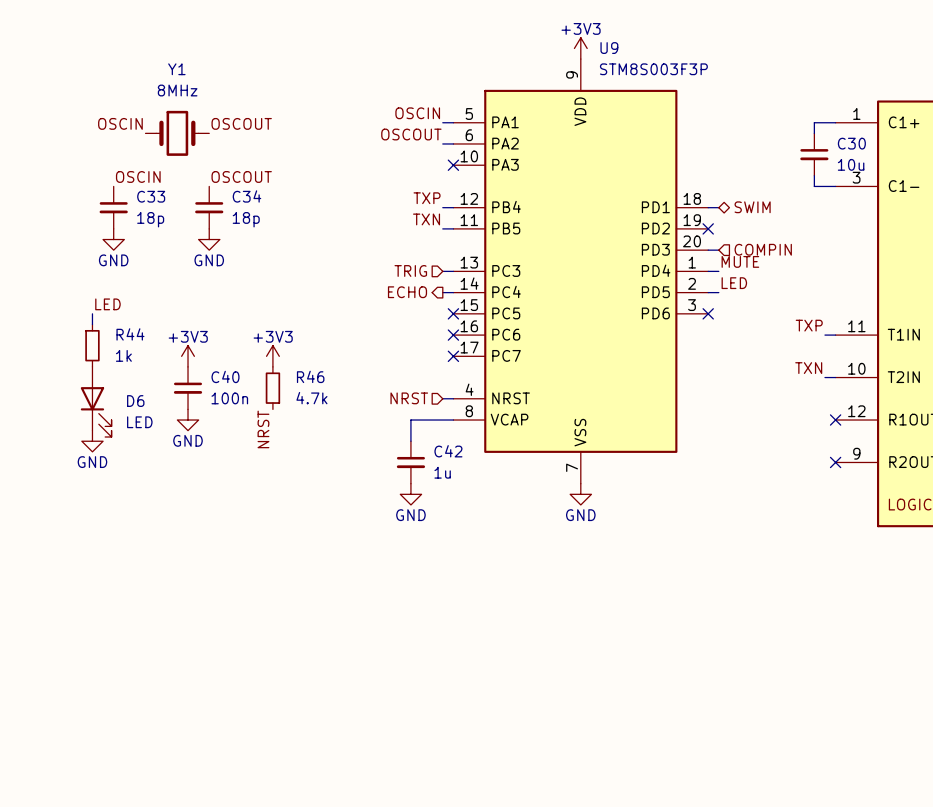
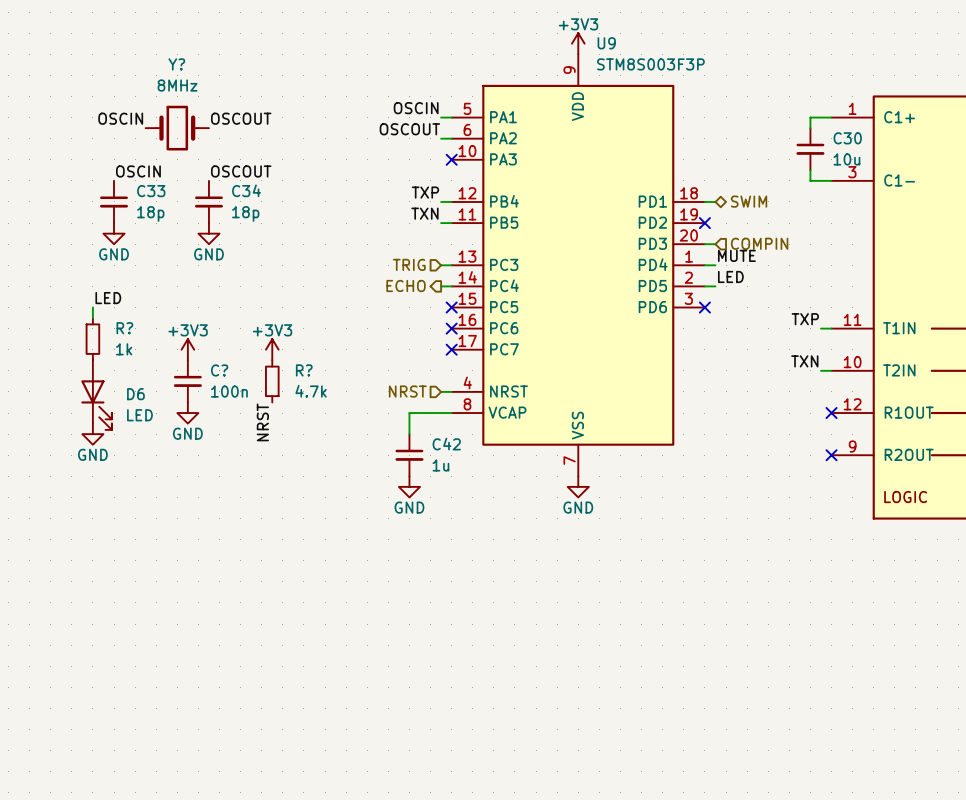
Y1 name: Y1 (176, 69) -> Y? (176, 64)
R44 name: R44 (130, 334) -> R? (124, 328)
C40 name: C40 (225, 376) -> C? (219, 370)
R46 name: R46 (310, 376) -> R? (304, 370)

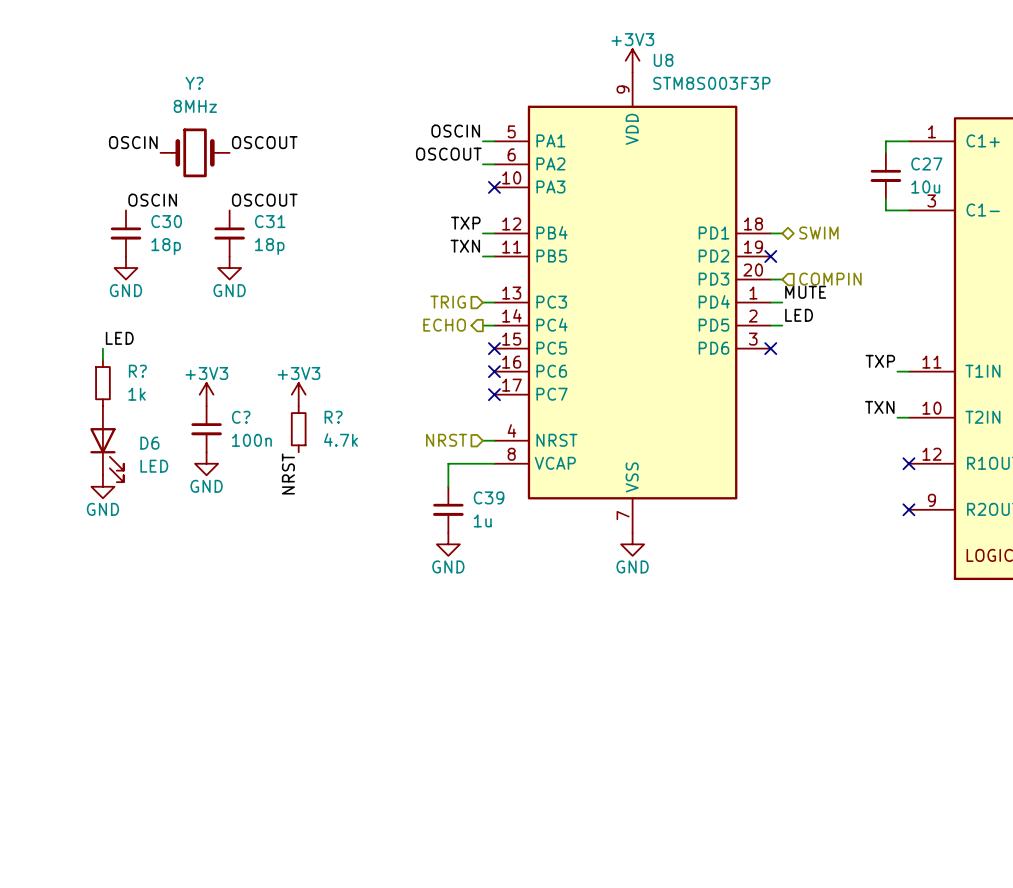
U9 name: U9 (606, 43) -> U8 (663, 60)
C30 name: C30 (847, 138) -> C27 (926, 164)
C34 name: C34 (246, 190) -> C31 (270, 221)
C33 name: C33 (151, 191) -> C30 (166, 221)
C42 name: C42 (446, 444) -> C39 (489, 497)

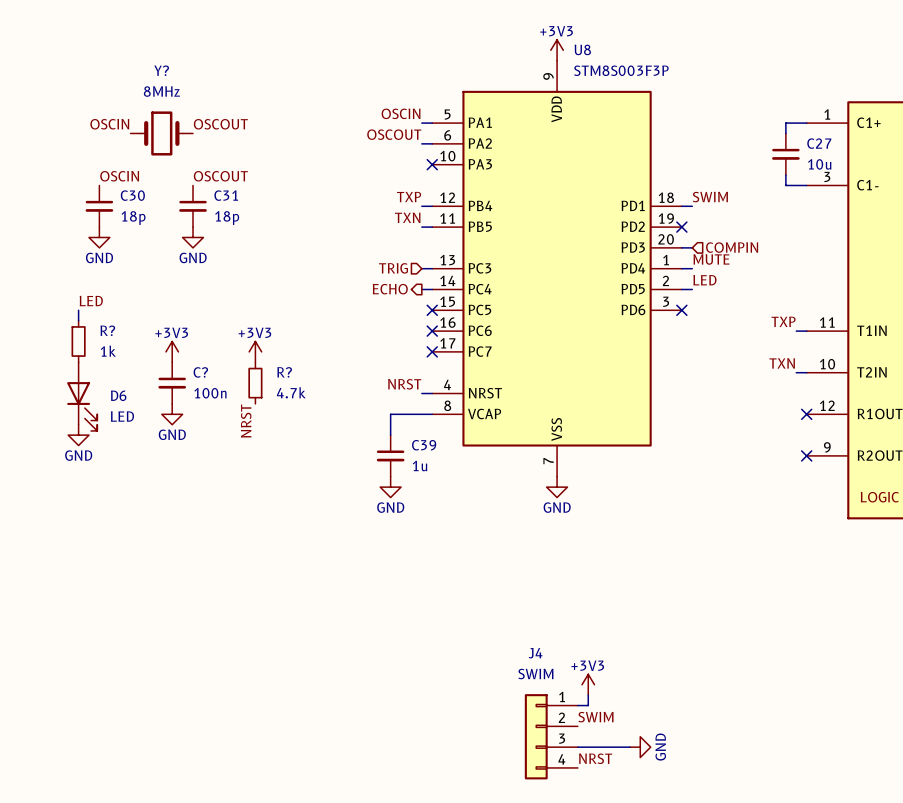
label: none -> SWIM (710, 197)
hierarchical label: SWIM (818, 233) -> none
label: none -> NRST (404, 384)
hierarchical label: NRST (446, 440) -> none
power symbol: none -> +3V3 (588, 684)
wire: none -> (588, 695) (588, 705) (577, 705)
label: none -> SWIM (595, 717)
J4: none -> SWIM (551, 736)
wire: none -> (577, 747) (629, 747)
power symbol: none -> GND (640, 747)
label: none -> NRST (595, 758)

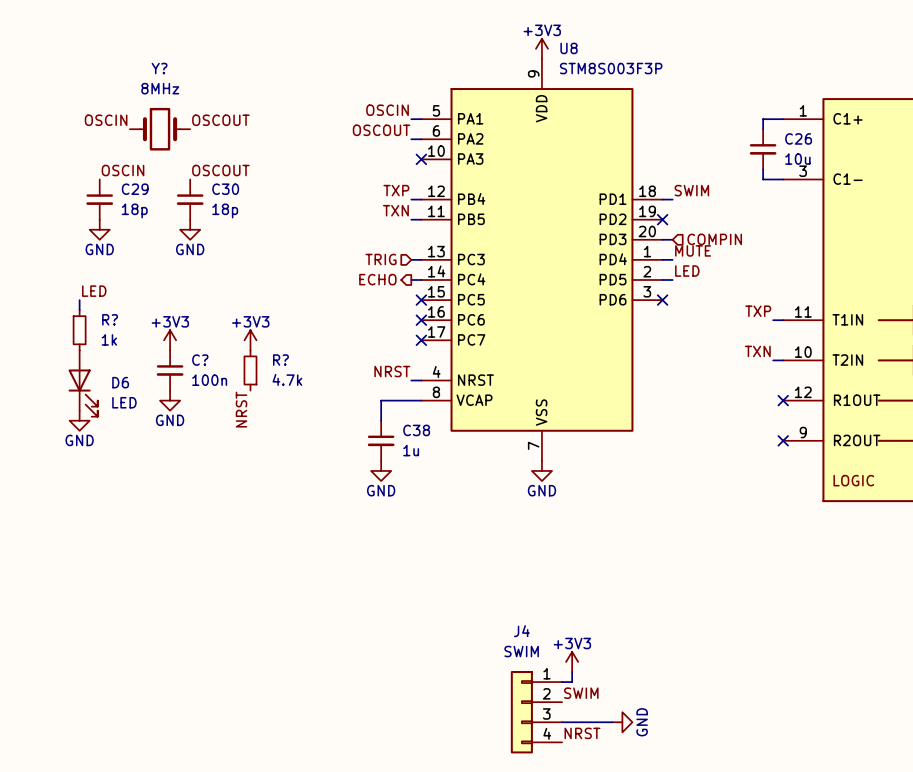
C27 name: C27 (819, 143) -> C26 (798, 138)
C30 name: C30 (132, 195) -> C29 (135, 189)
C31 name: C31 (226, 195) -> C30 (225, 189)
C39 name: C39 (424, 445) -> C38 (416, 430)

